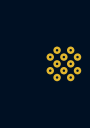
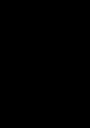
part: (63, 63) -> none

